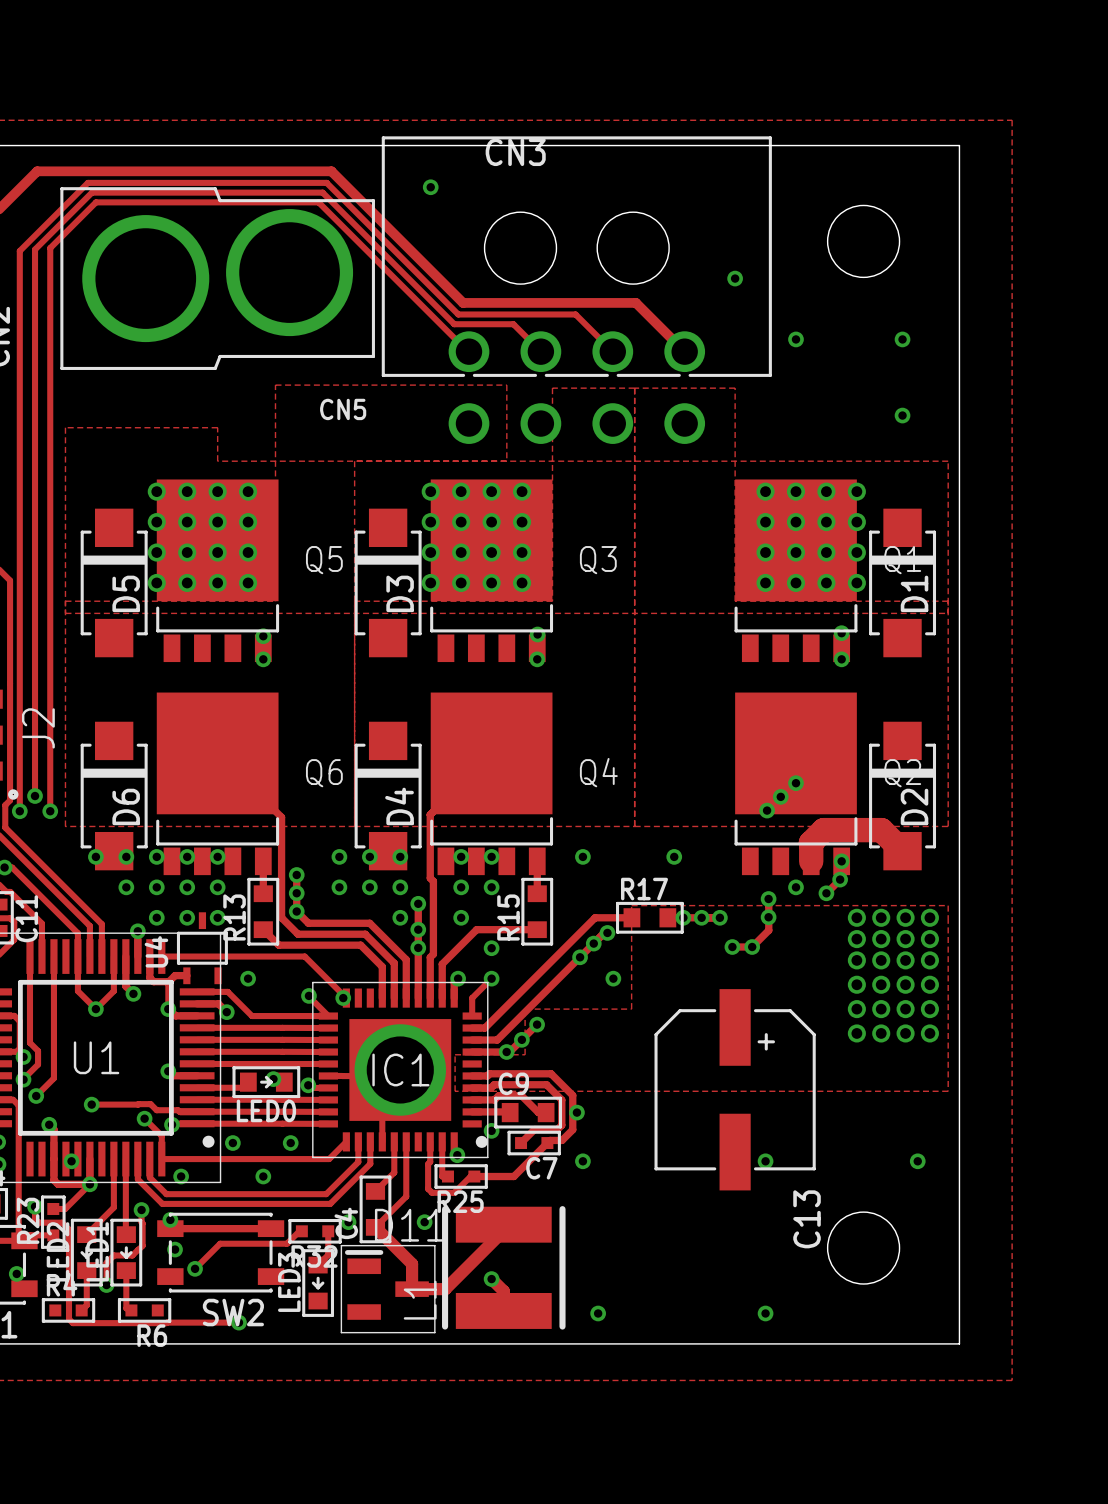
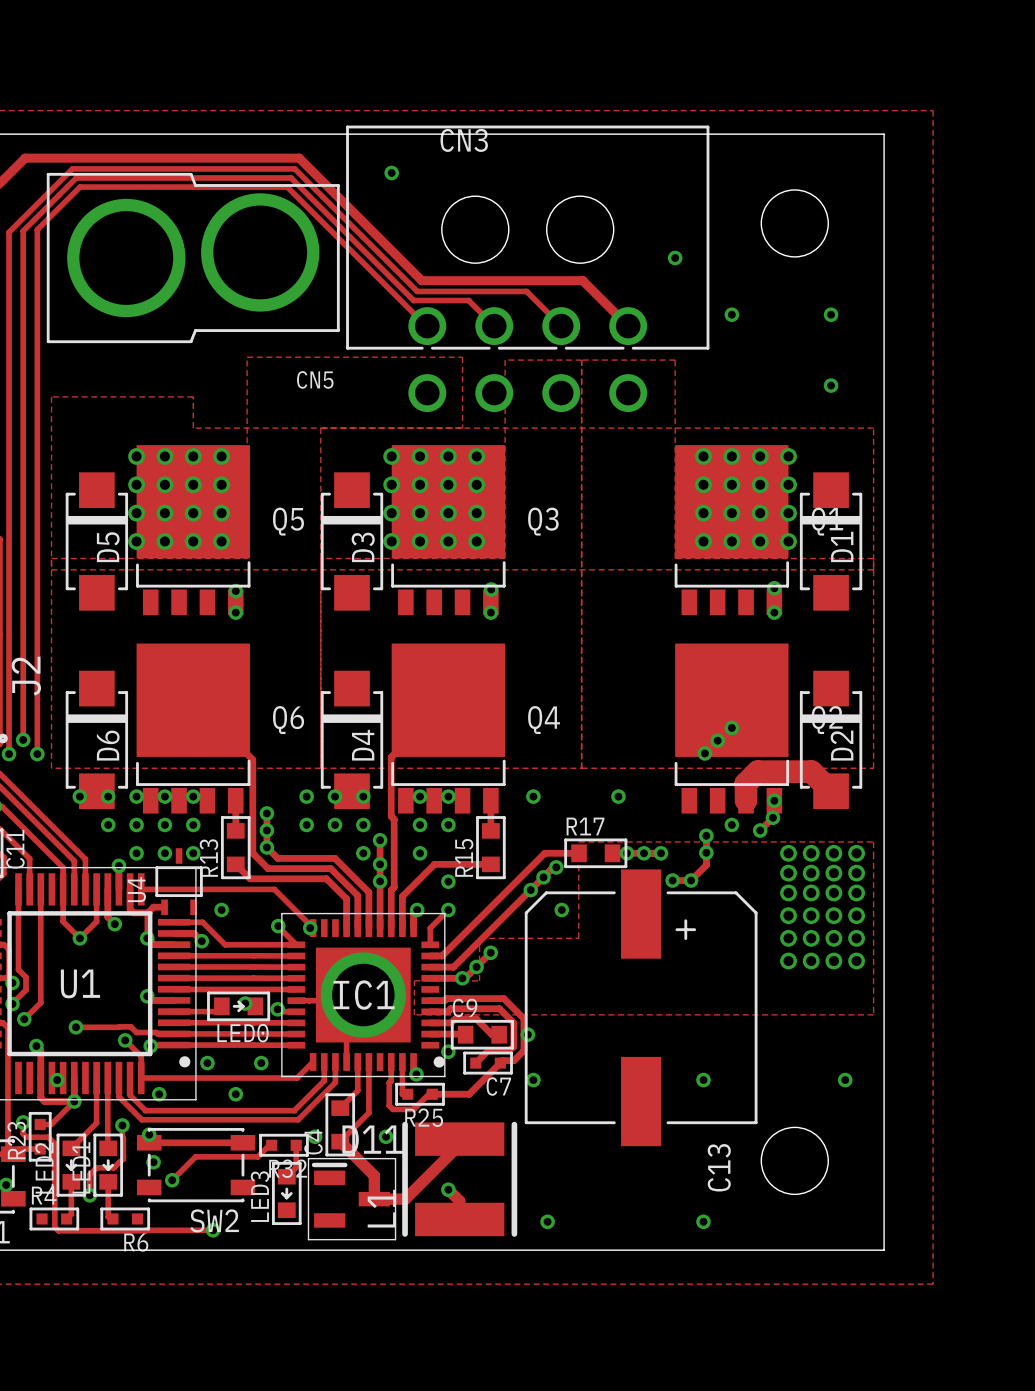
C13 footprint: [654, 989, 816, 1191] -> [524, 869, 758, 1147]
C13 name position: C13 (807, 1219) -> C13 (719, 1167)

